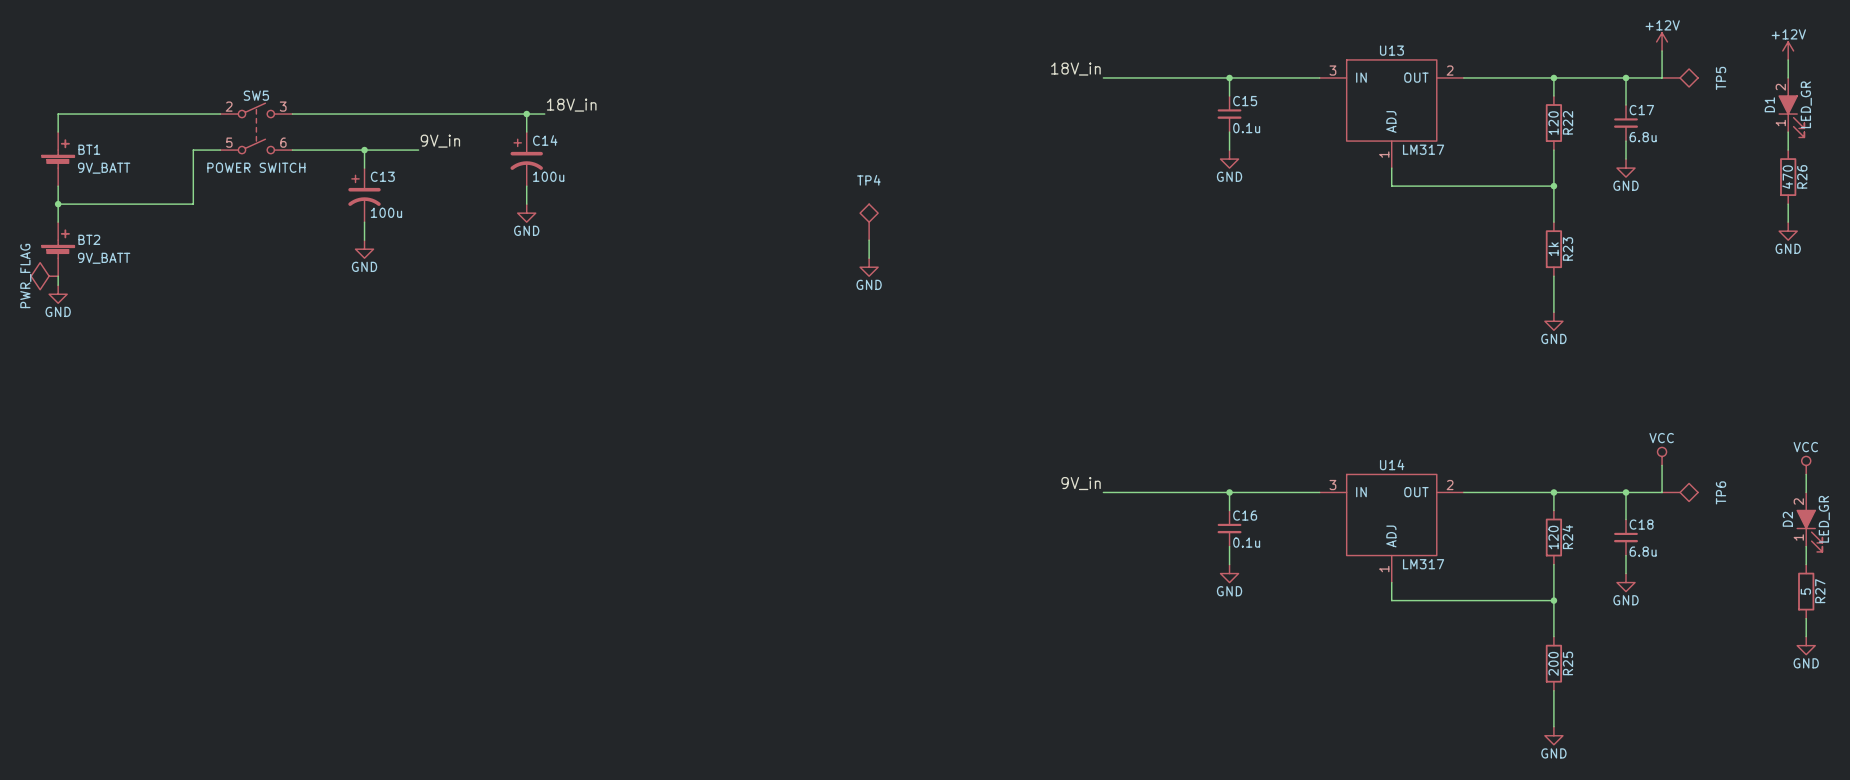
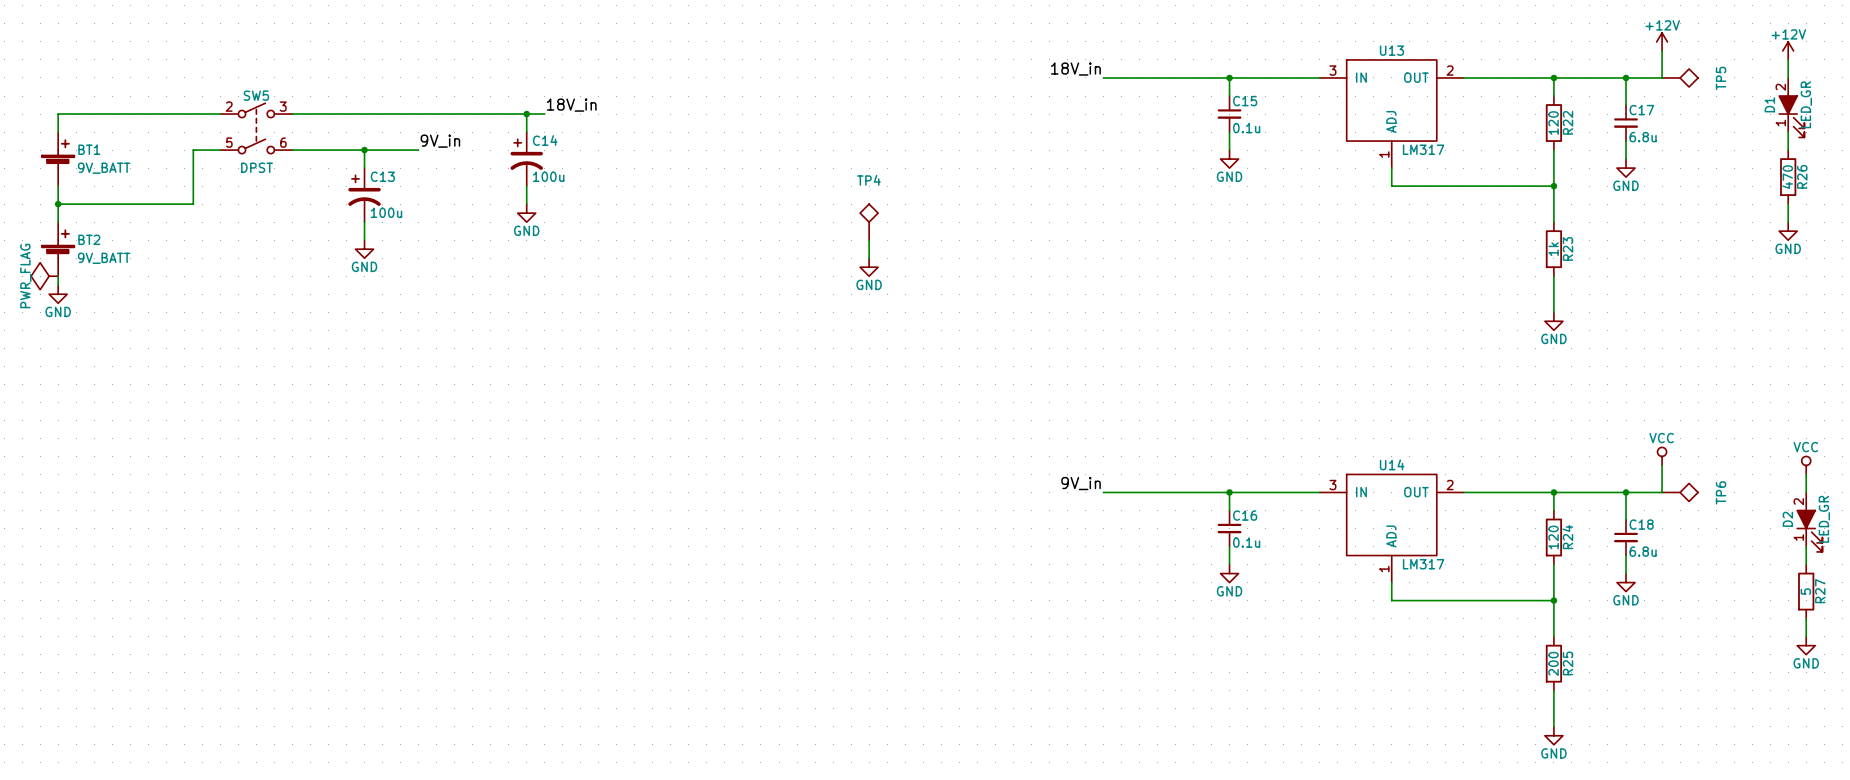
SW5 value: POWER SWITCH (256, 167) -> DPST (257, 167)

